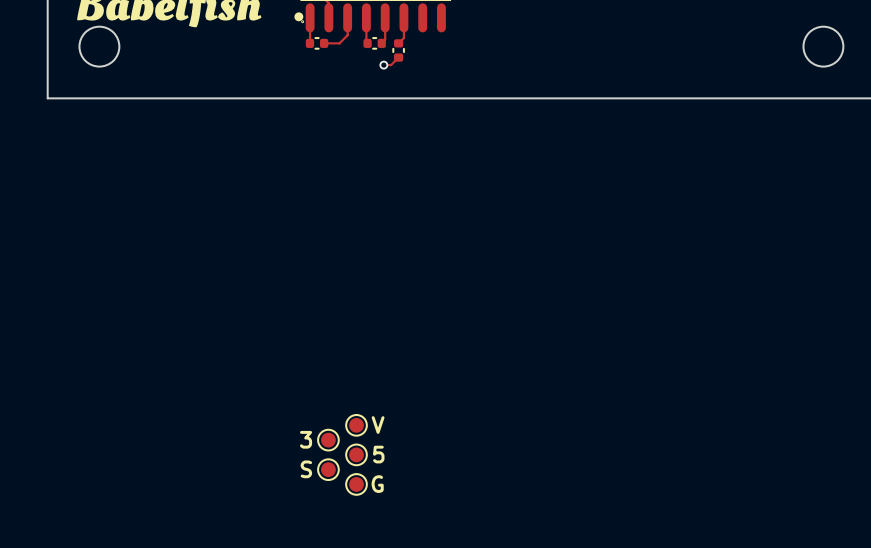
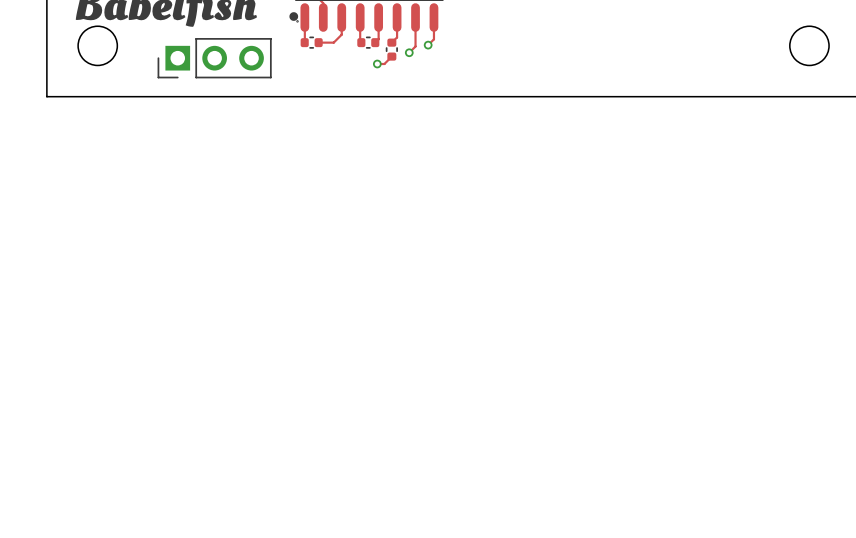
track: none -> (415, 17) (415, 46) (409, 52)
track: none -> (433, 17) (433, 39) (428, 45)
via: none -> (428, 45)
via: none -> (409, 52)
part: none -> (214, 58)
part: (356, 425) -> none
text: V (378, 425) -> none
text: 3 (306, 439) -> none
part: (328, 440) -> none
part: (356, 454) -> none
text: 5 (378, 454) -> none
text: S (306, 469) -> none
part: (328, 469) -> none
part: (356, 484) -> none
text: G (377, 484) -> none

